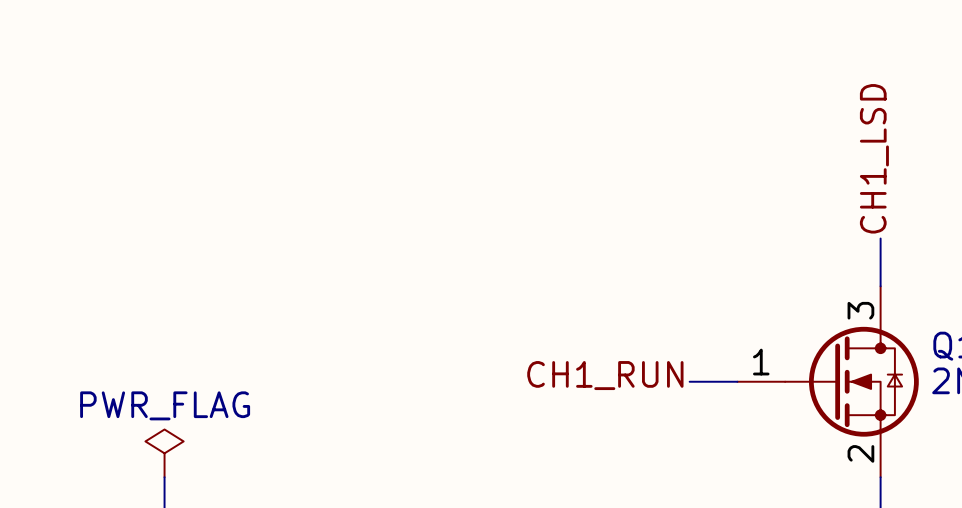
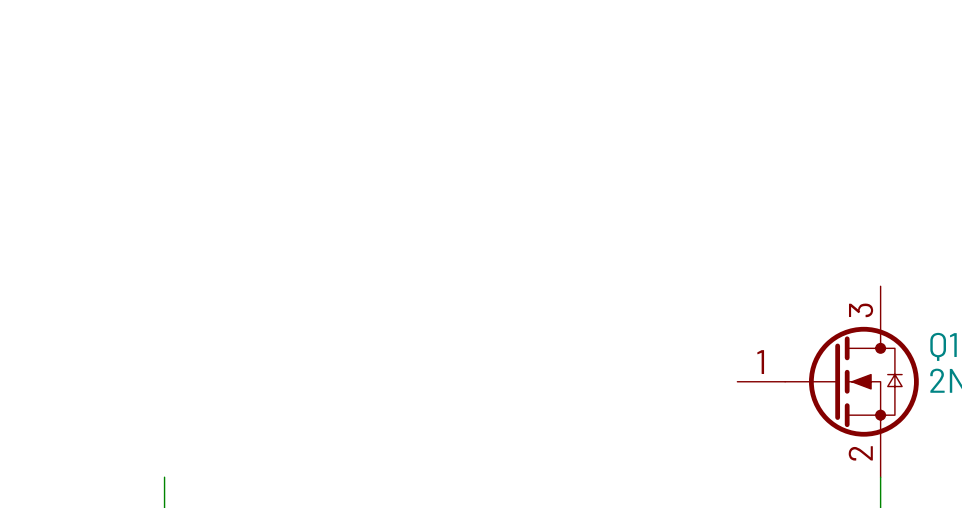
label: CH1_LSD (874, 158) -> none
wire: (880, 238) (880, 286) -> none
label: CH1_RUN (605, 375) -> none
wire: (689, 381) (737, 381) -> none
power symbol: PWR_FLAG (164, 453) -> none

